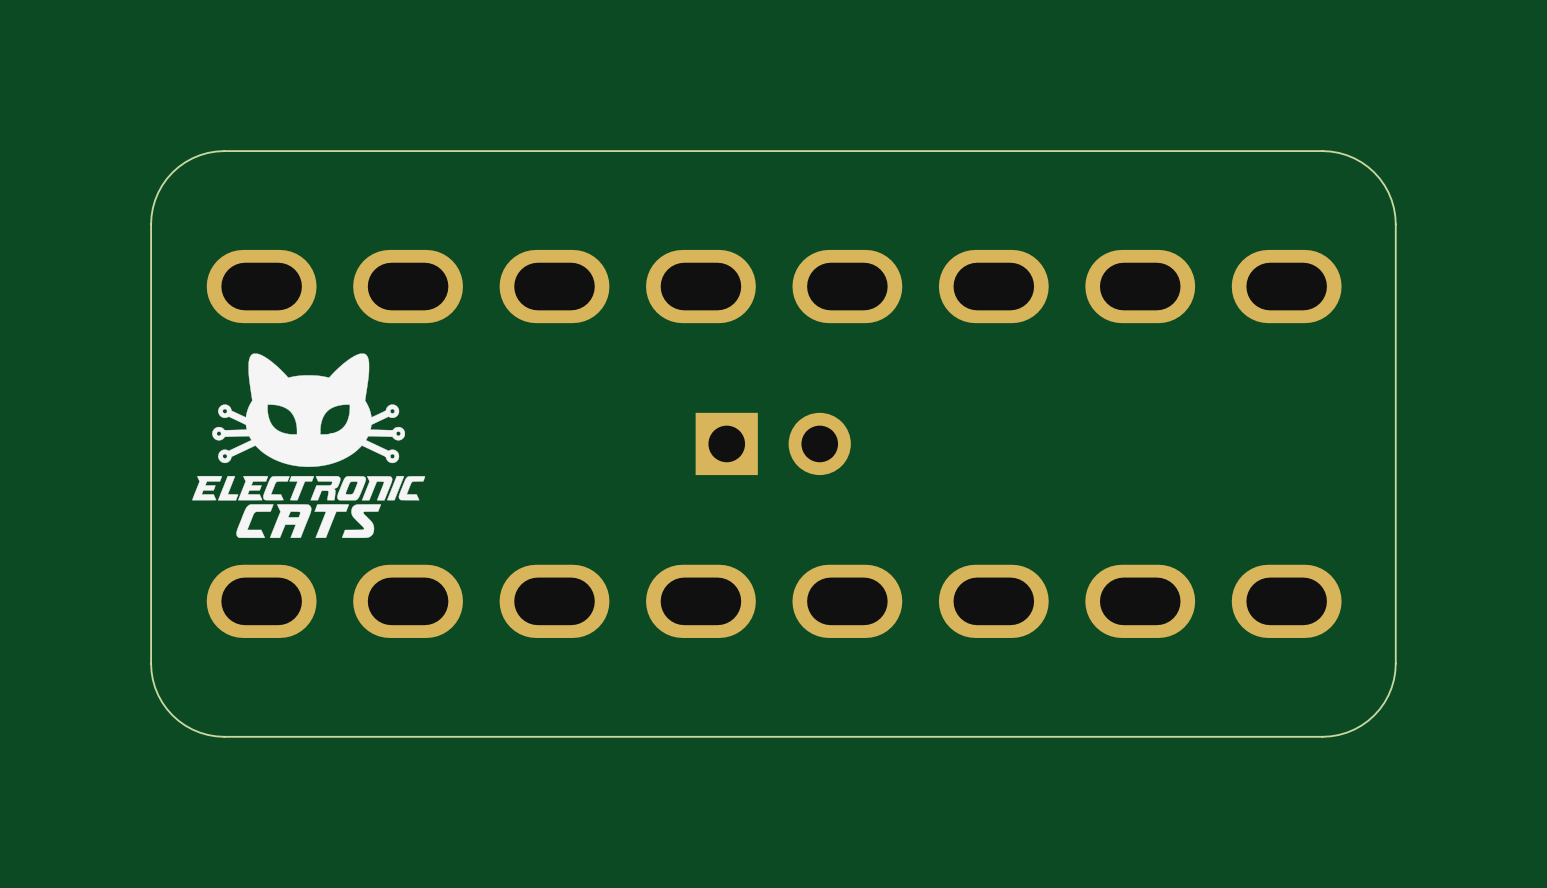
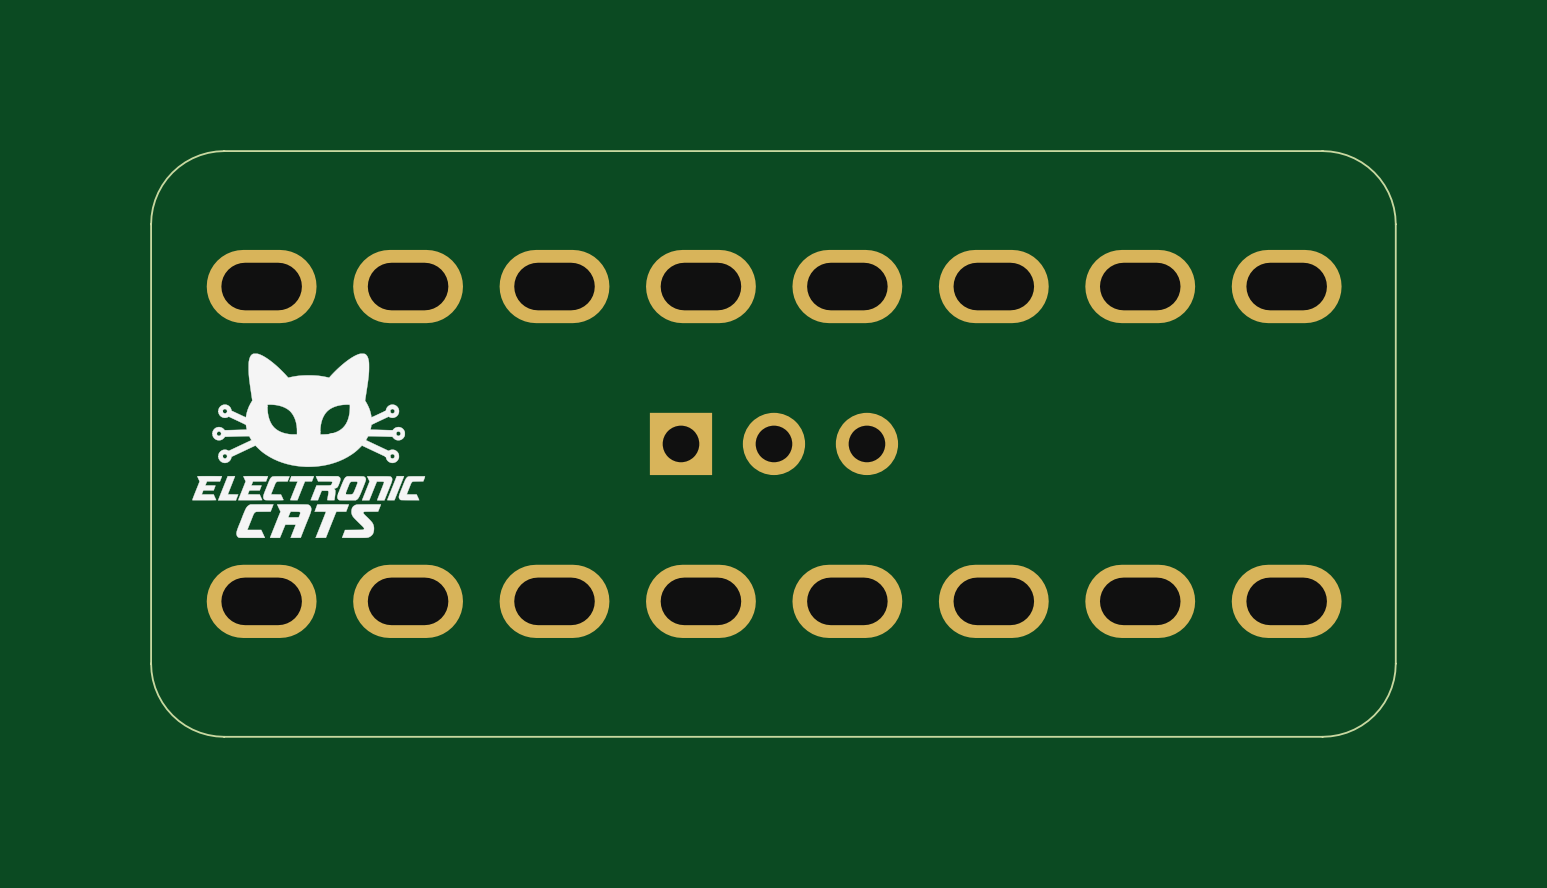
part footprint: [695, 412, 851, 476] -> [649, 412, 899, 476]

